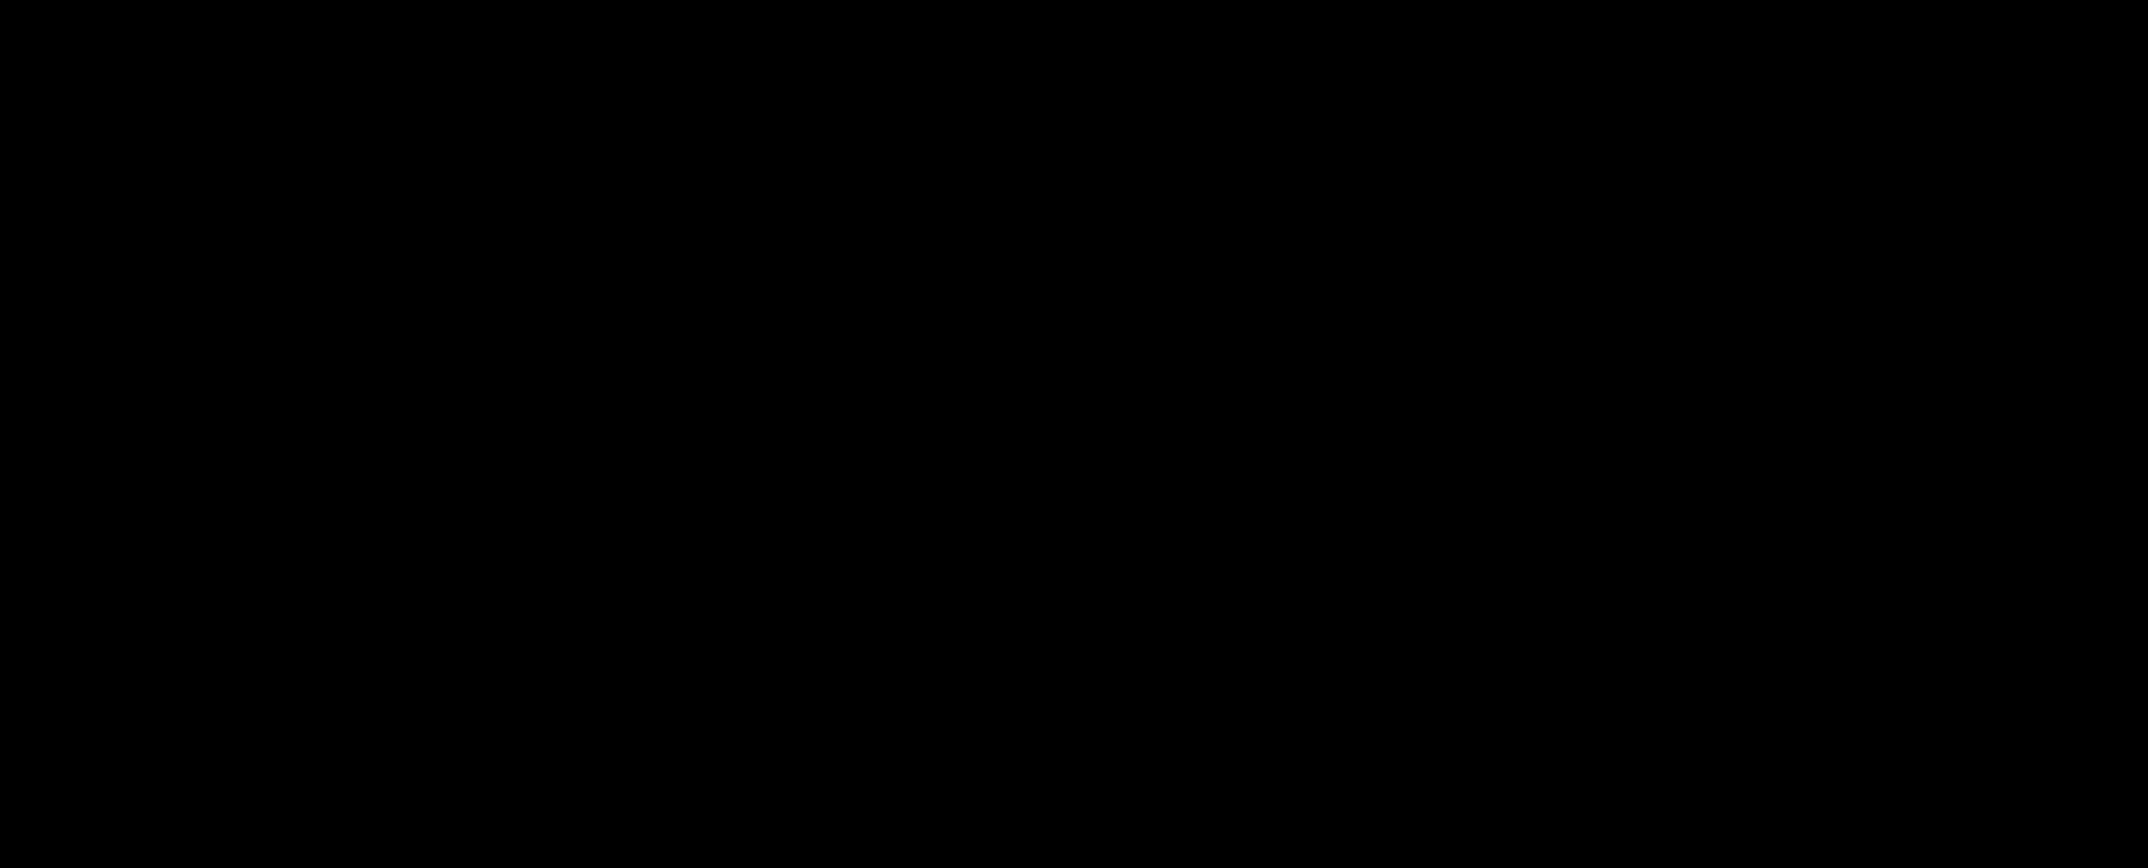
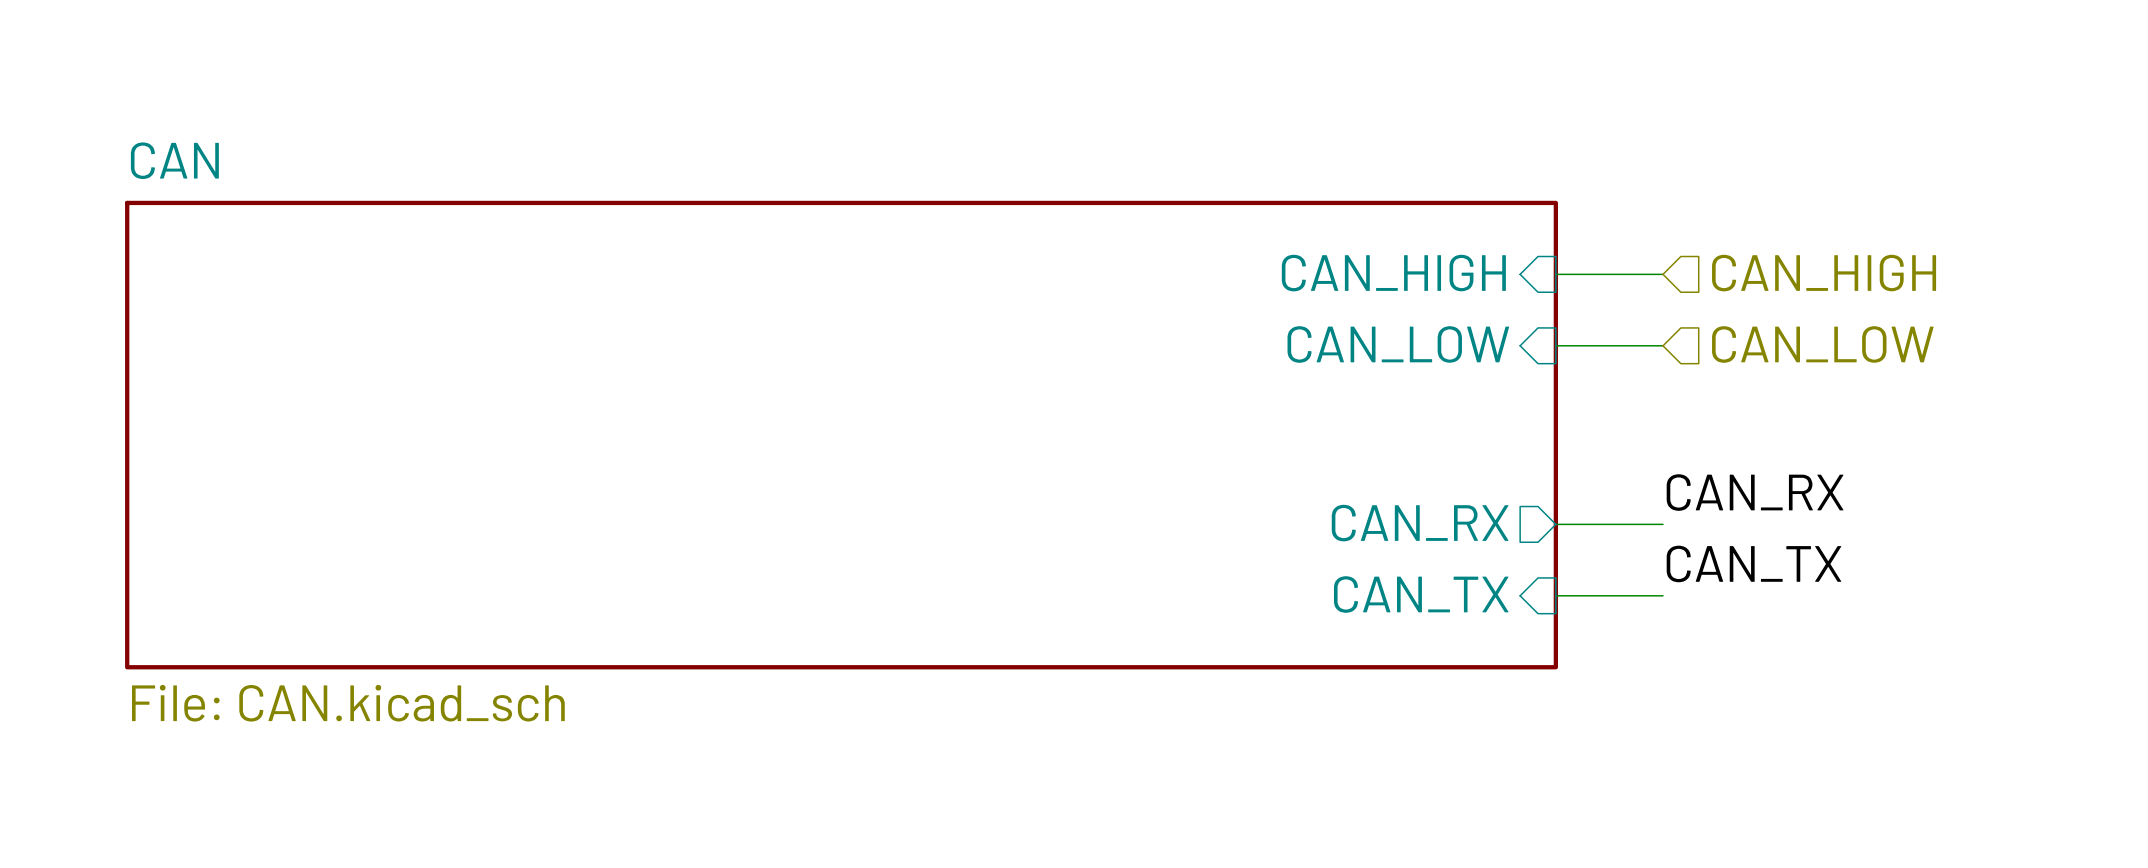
wire: none -> (1555, 274) (1663, 274)
sheet pin: none -> CAN_HIGH (1393, 273)
hierarchical label: none -> CAN_HIGH (1824, 273)
wire: none -> (1555, 345) (1663, 345)
sheet pin: none -> CAN_LOW (1398, 344)
hierarchical label: none -> CAN_LOW (1822, 344)
sheet CAN: none -> File: CAN.kicad_sch (841, 435)
label: none -> CAN_RX (1755, 492)
wire: none -> (1555, 524) (1663, 524)
sheet pin: none -> CAN_RX (1420, 523)
label: none -> CAN_TX (1753, 563)
wire: none -> (1555, 595) (1663, 595)
sheet pin: none -> CAN_TX (1421, 594)

